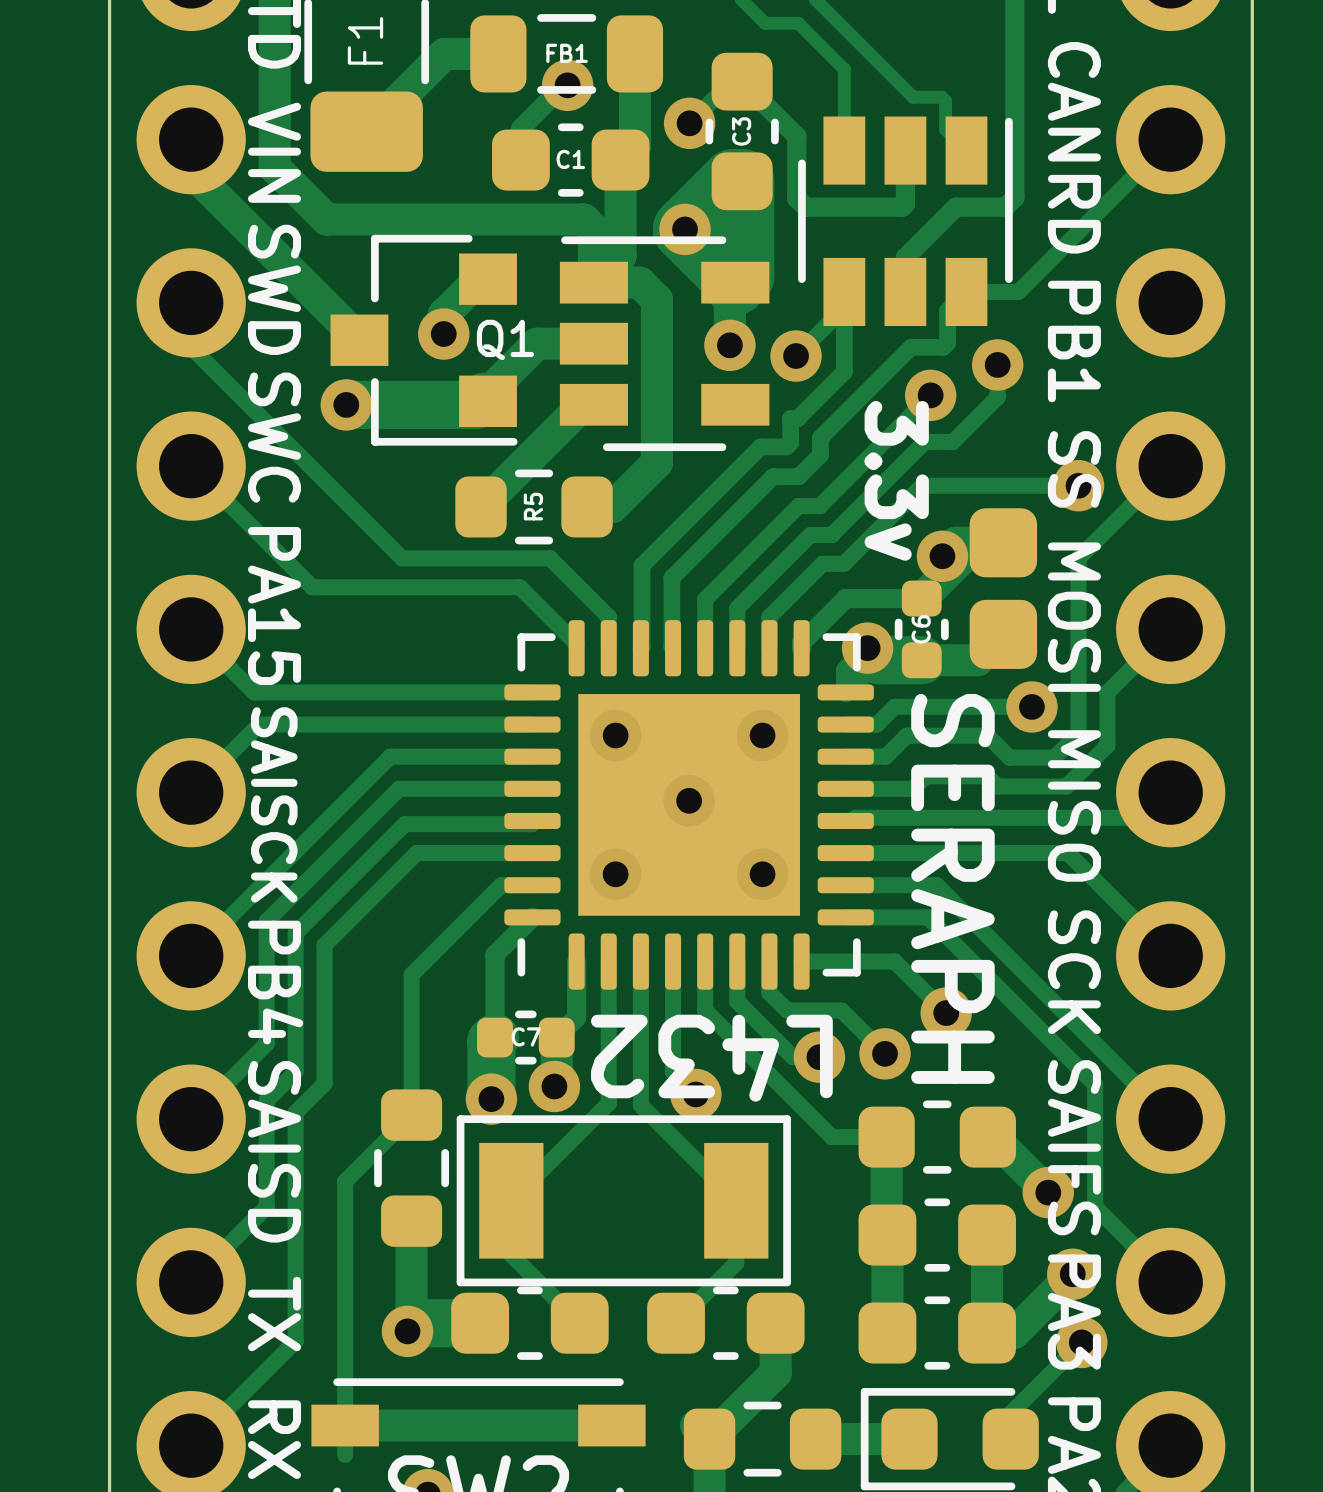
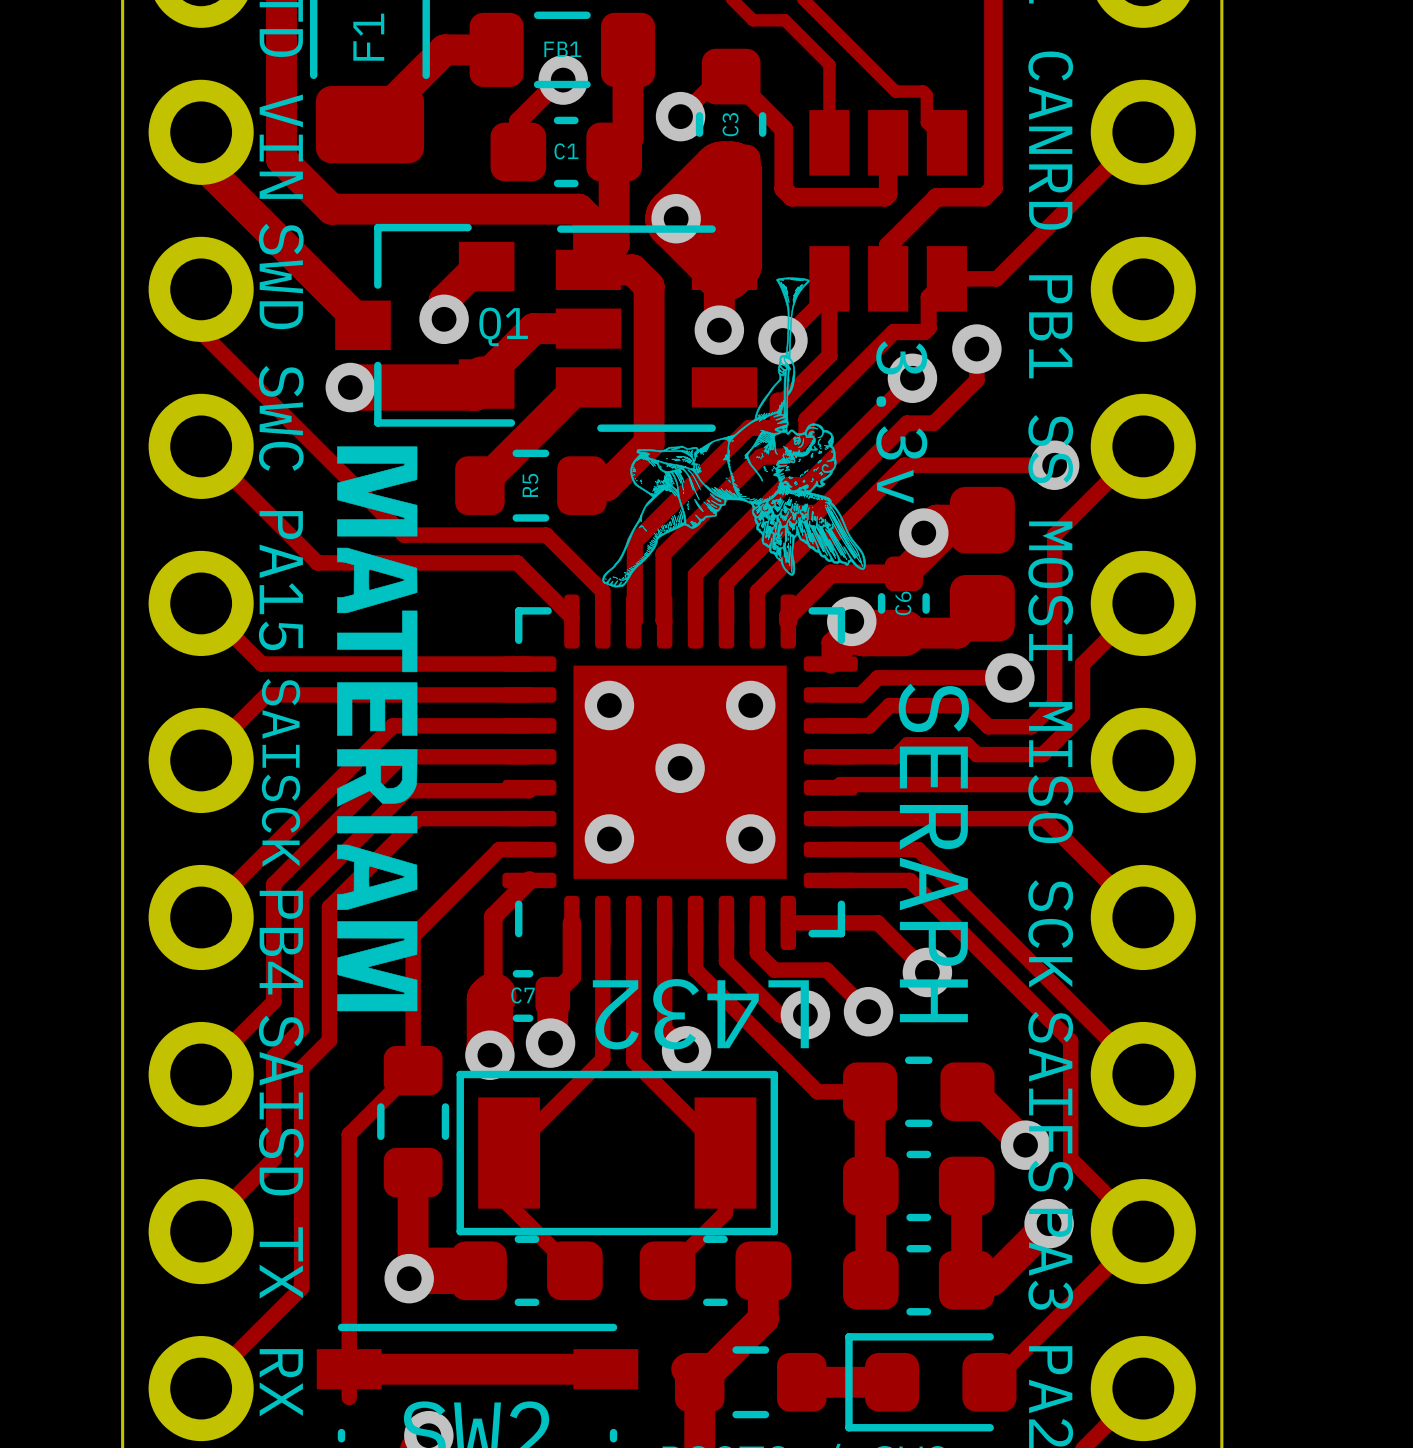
part footprint: [798, 116, 1013, 327] -> [809, 110, 967, 312]
drawing: none -> [602, 277, 866, 588]
drawing: none -> [337, 446, 418, 1012]
text position: 3.3v (896, 480) -> 3.3v (901, 422)
track: (1081, 1342) (1010, 1413) (1010, 1439) -> (1143, 1231) (992, 1382) (989, 1382)
via: (1081, 1342) -> none

